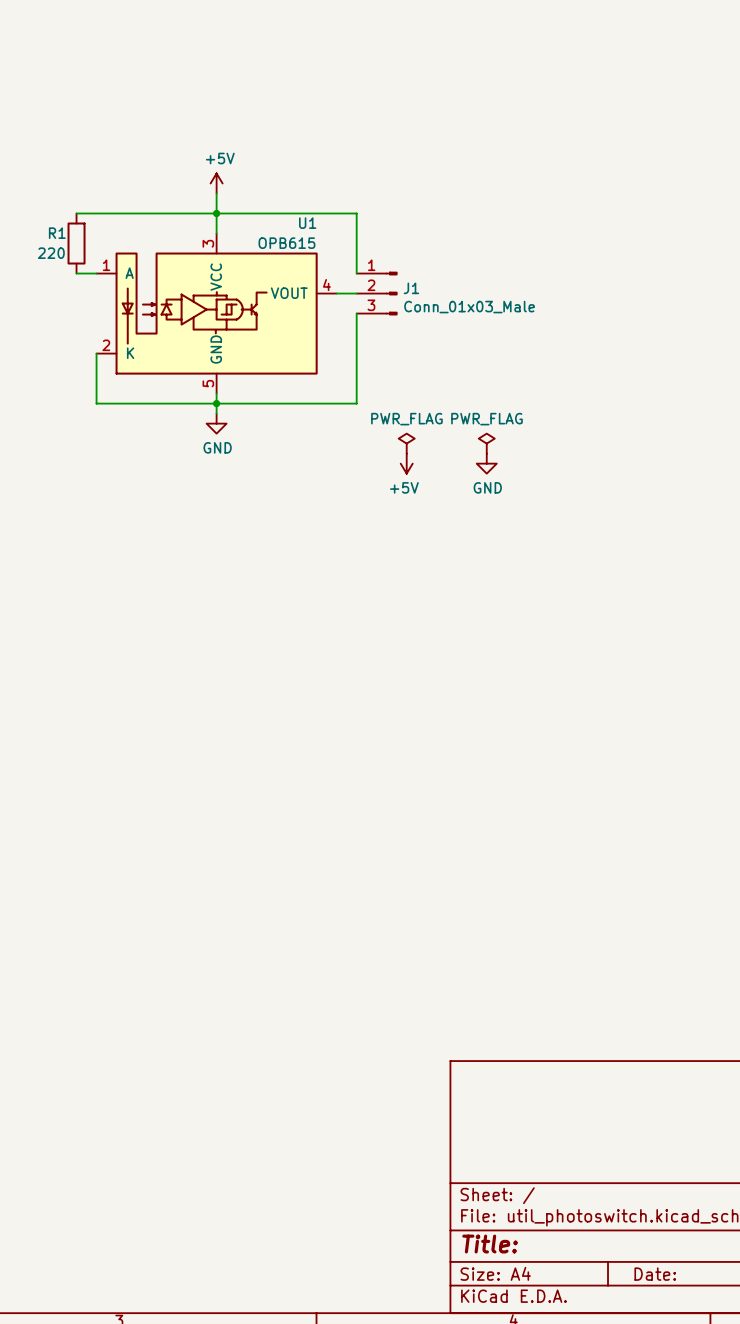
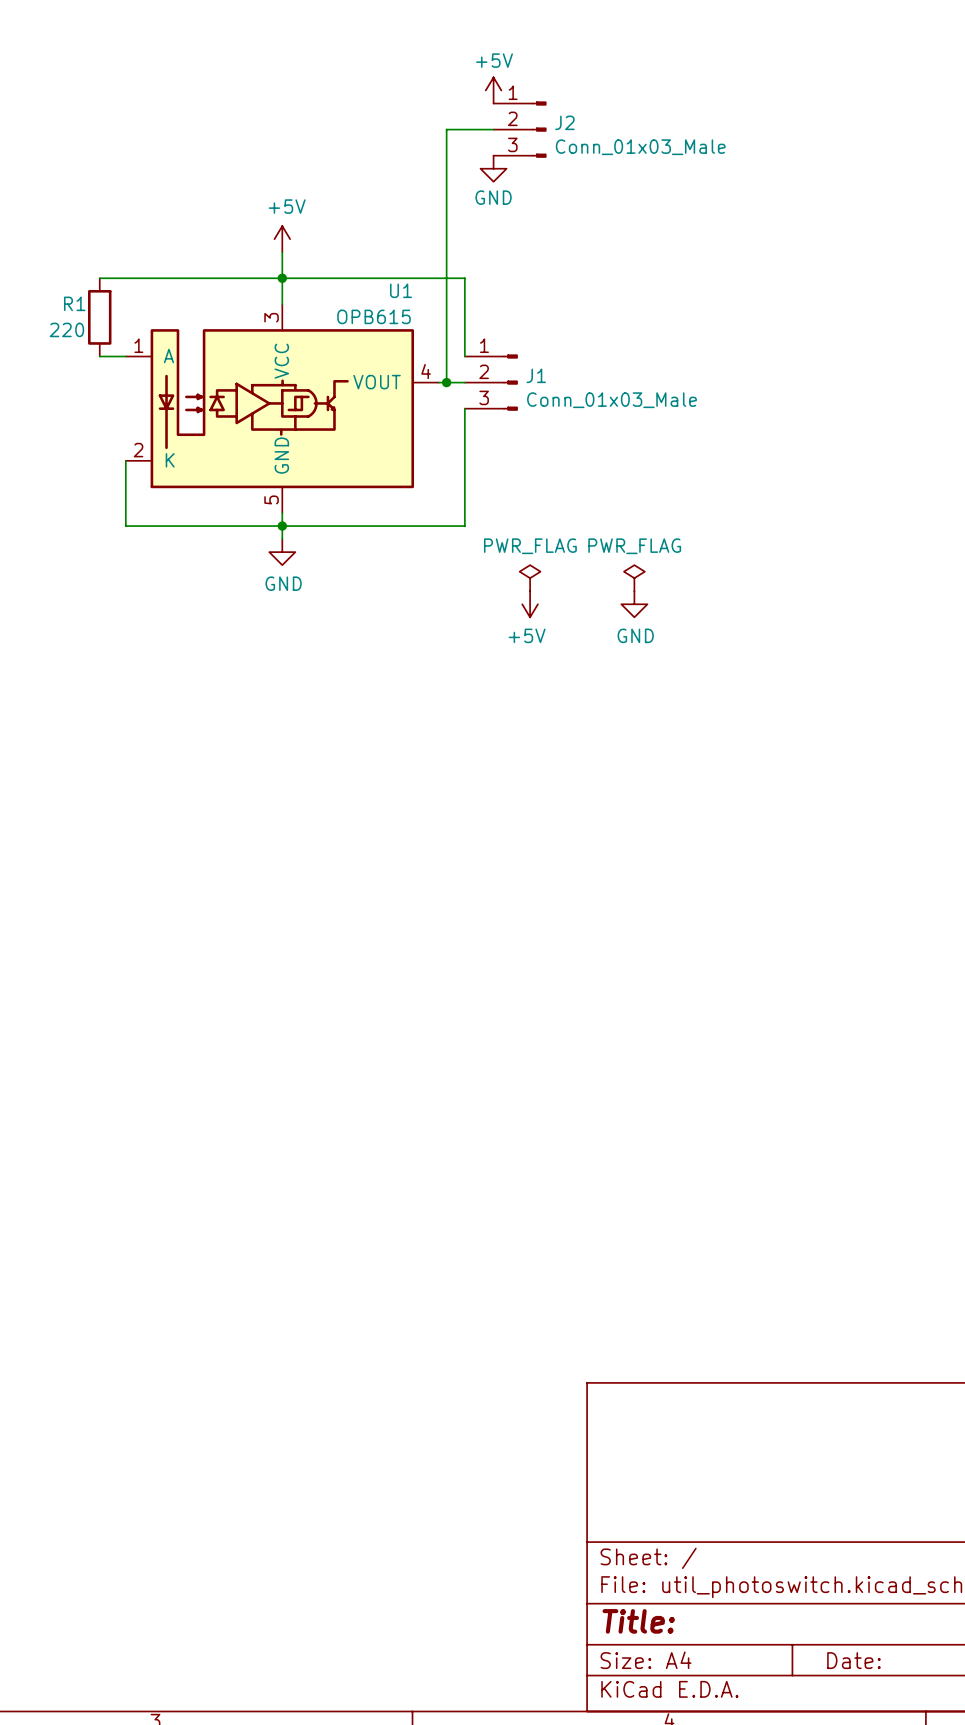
power symbol: none -> +5V (493, 90)
wire: none -> (493, 129) (446, 129) (446, 382)
J2: none -> Conn_01x03_Male (520, 129)
power symbol: none -> GND (493, 168)
junction: none -> (446, 382)

